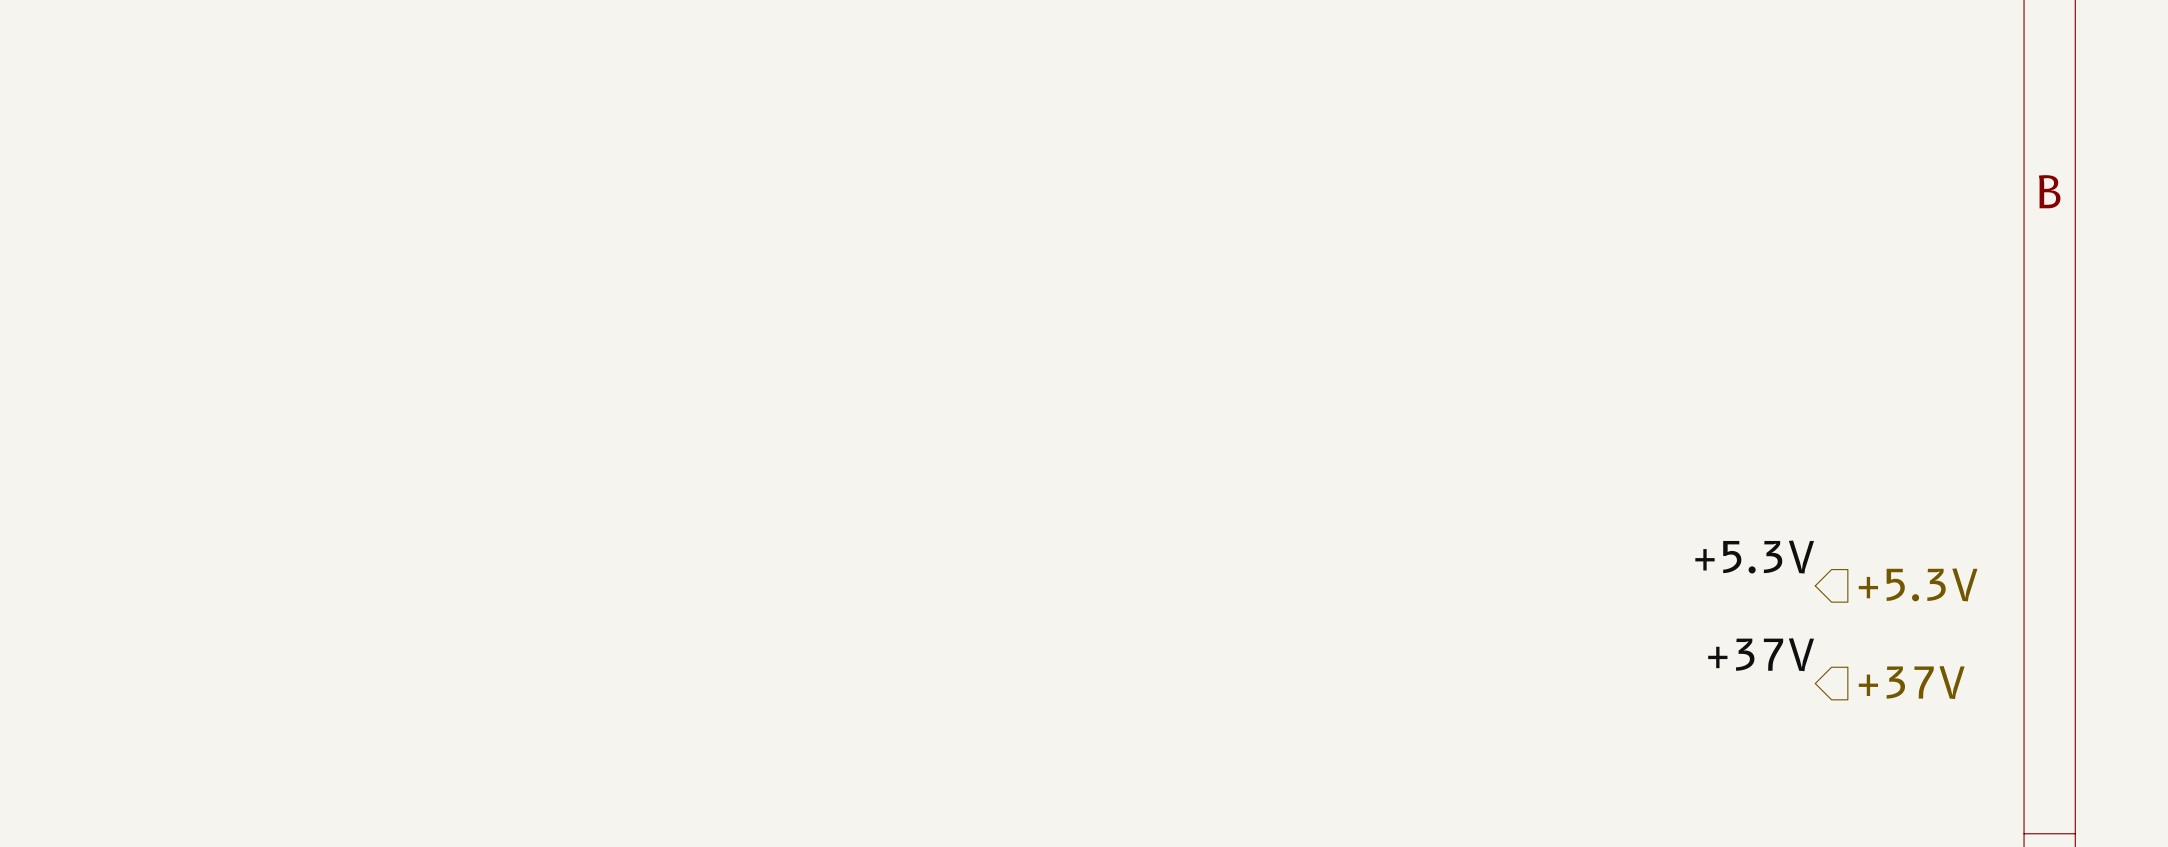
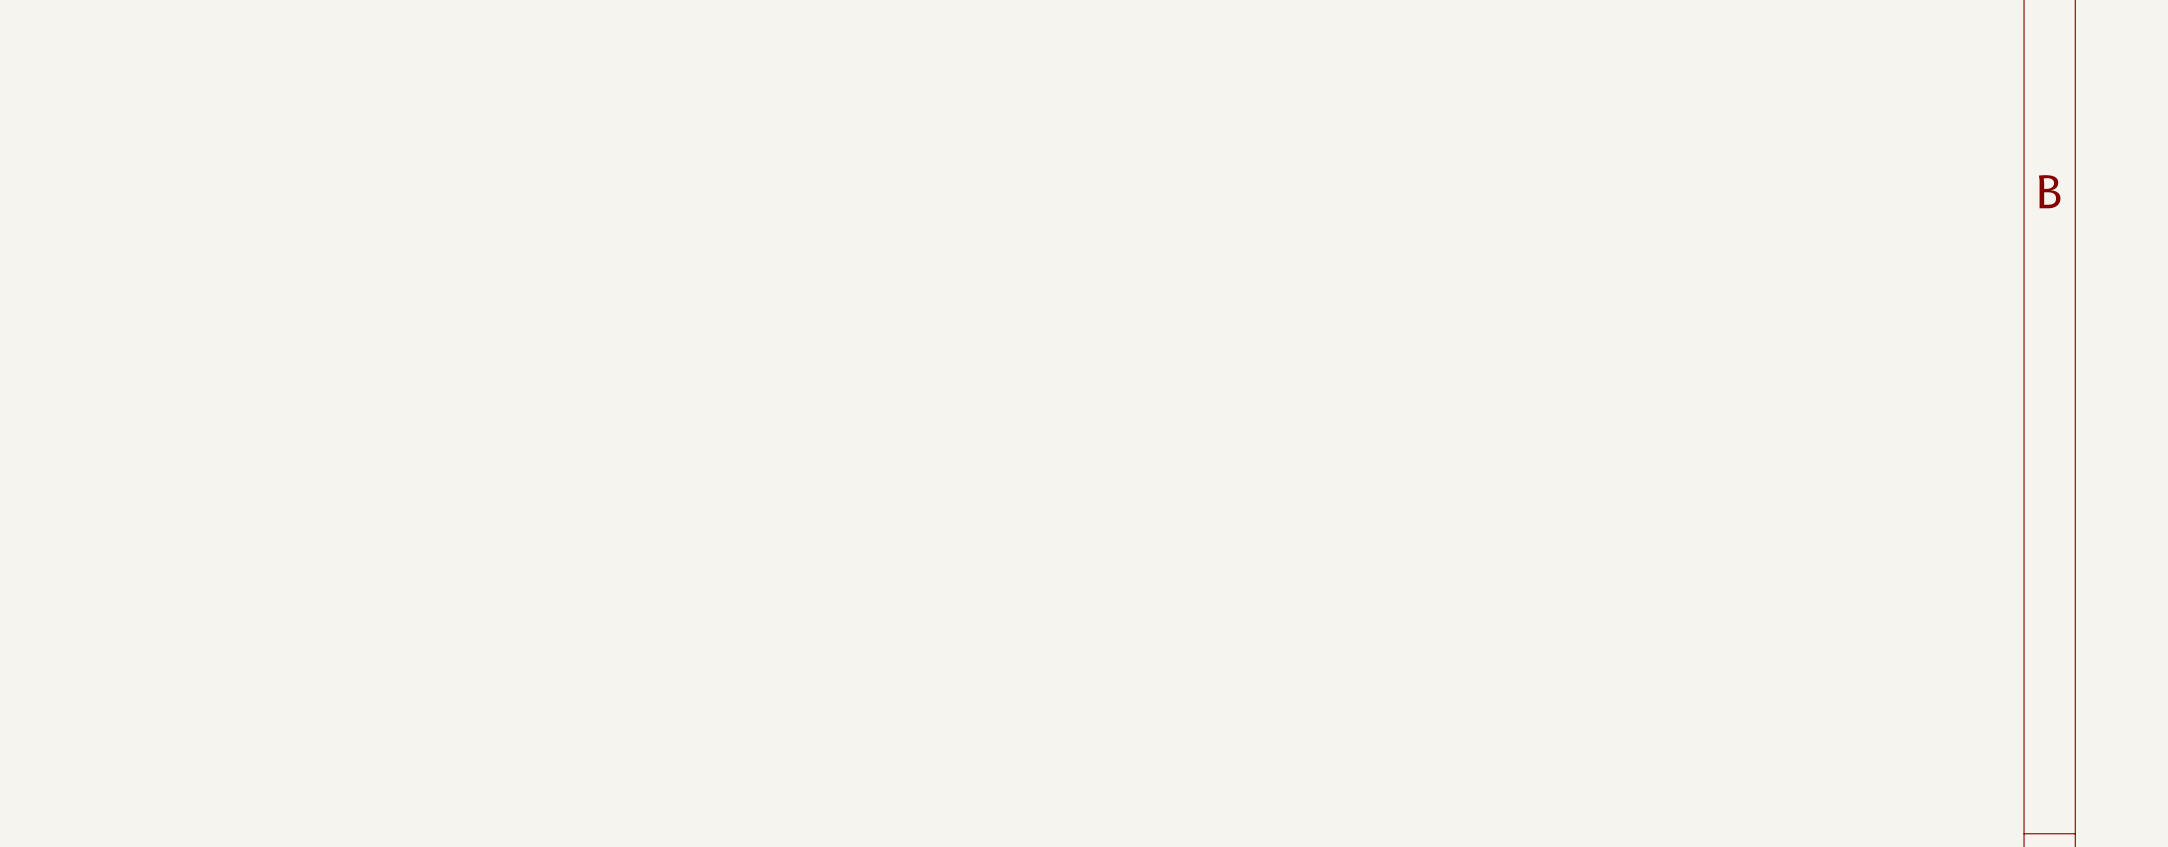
label: +5.3V (1754, 557) -> none
hierarchical label: +5.3V (1918, 584) -> none
label: +37V (1761, 654) -> none
hierarchical label: +37V (1911, 682) -> none

